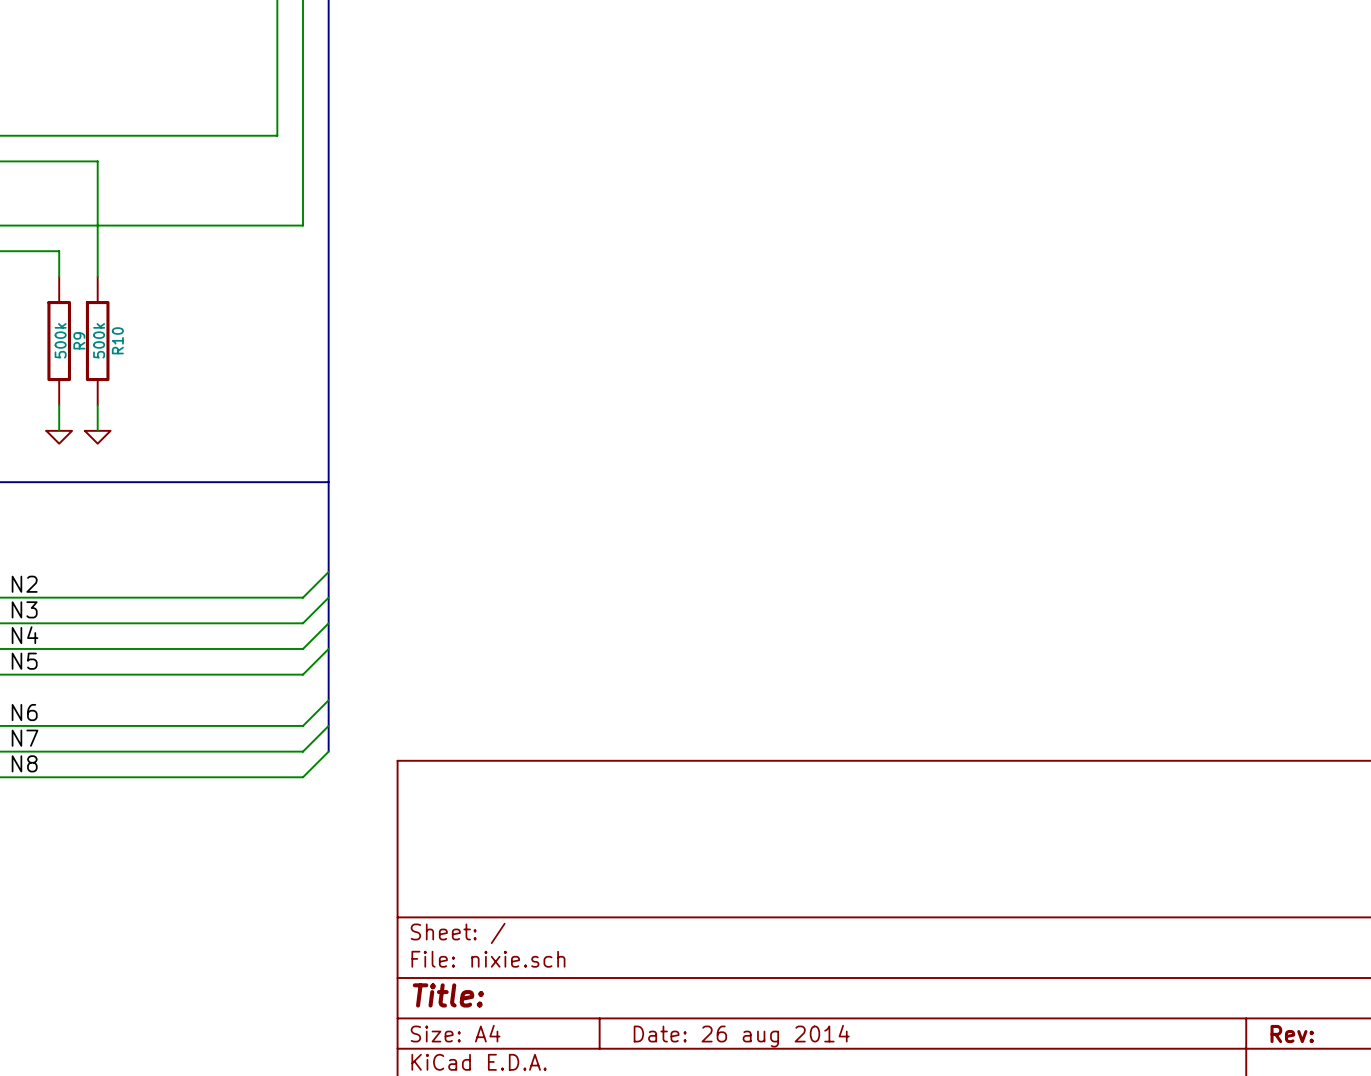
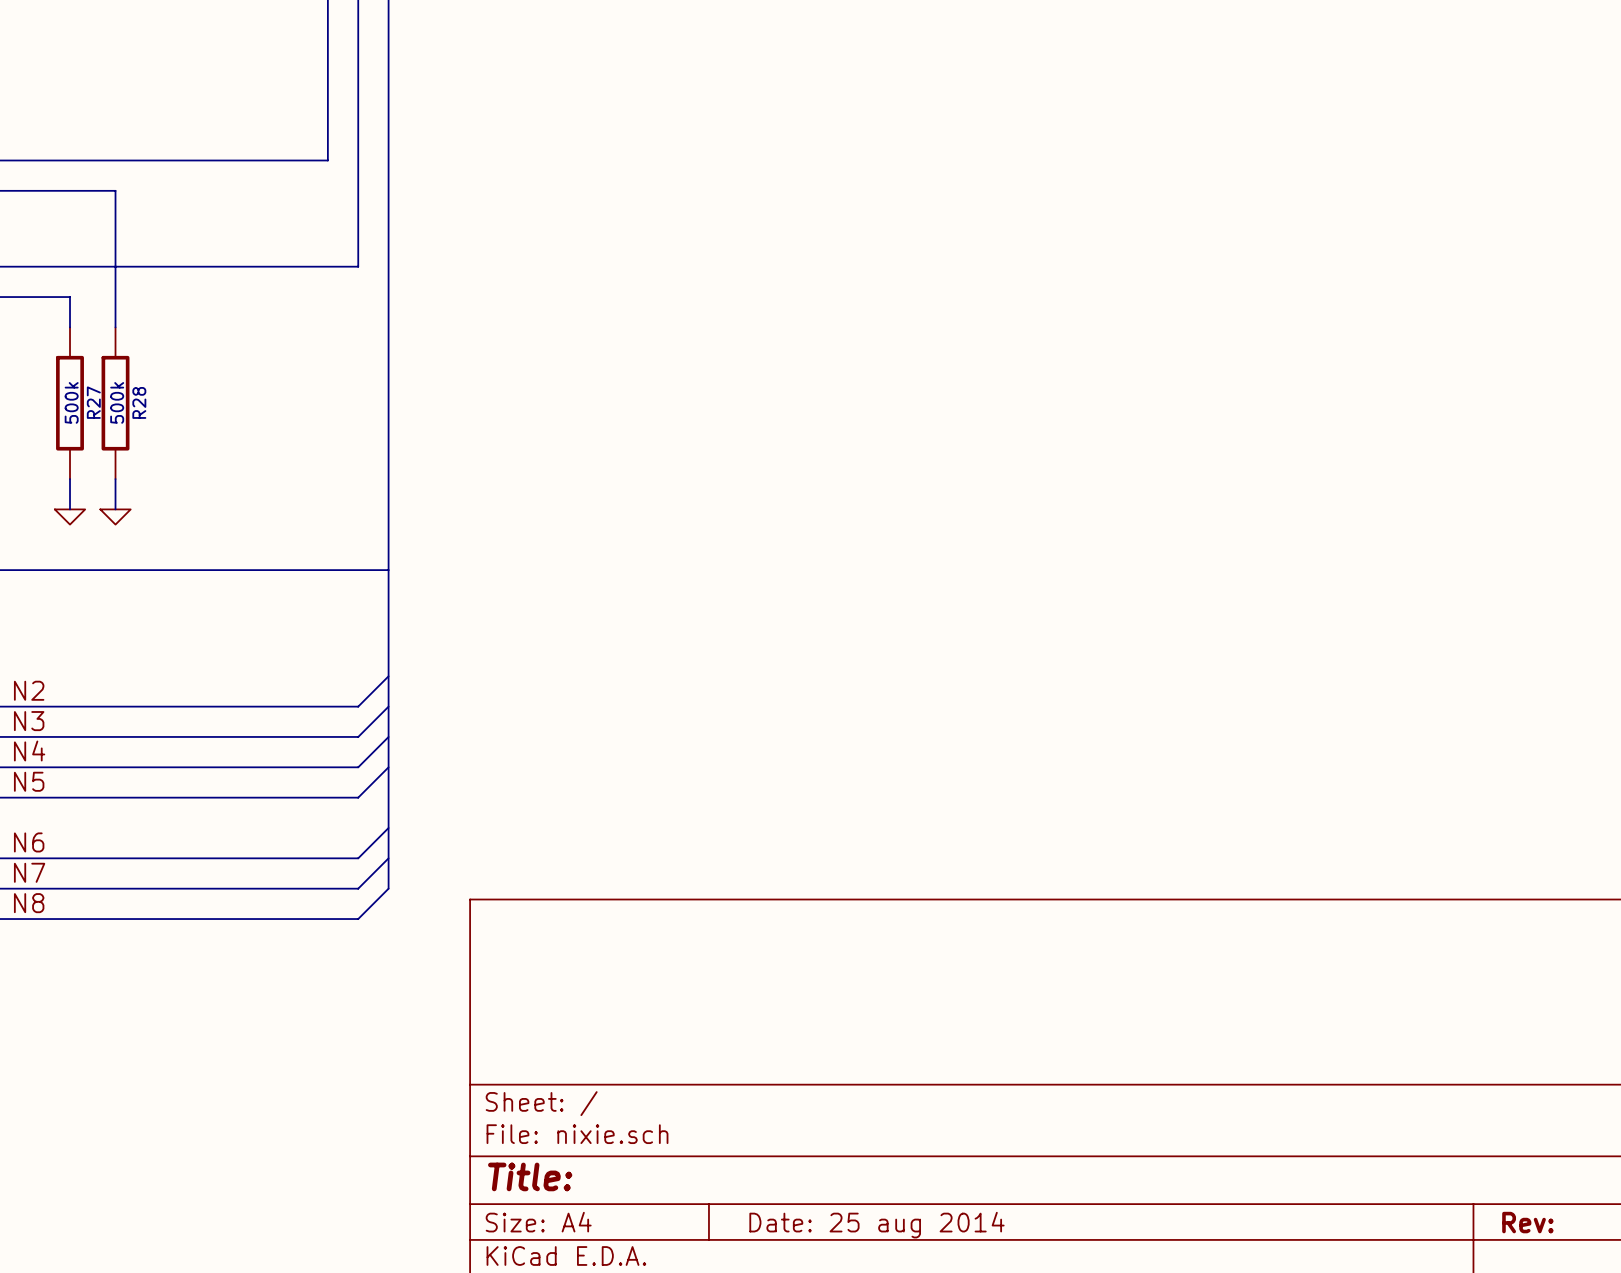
R9 name: R9 (79, 340) -> R27 (93, 402)
R10 name: R10 (117, 340) -> R28 (139, 402)
title block: Date: 26 aug 2014 (741, 1036) -> Date: 25 aug 2014 (876, 1225)

